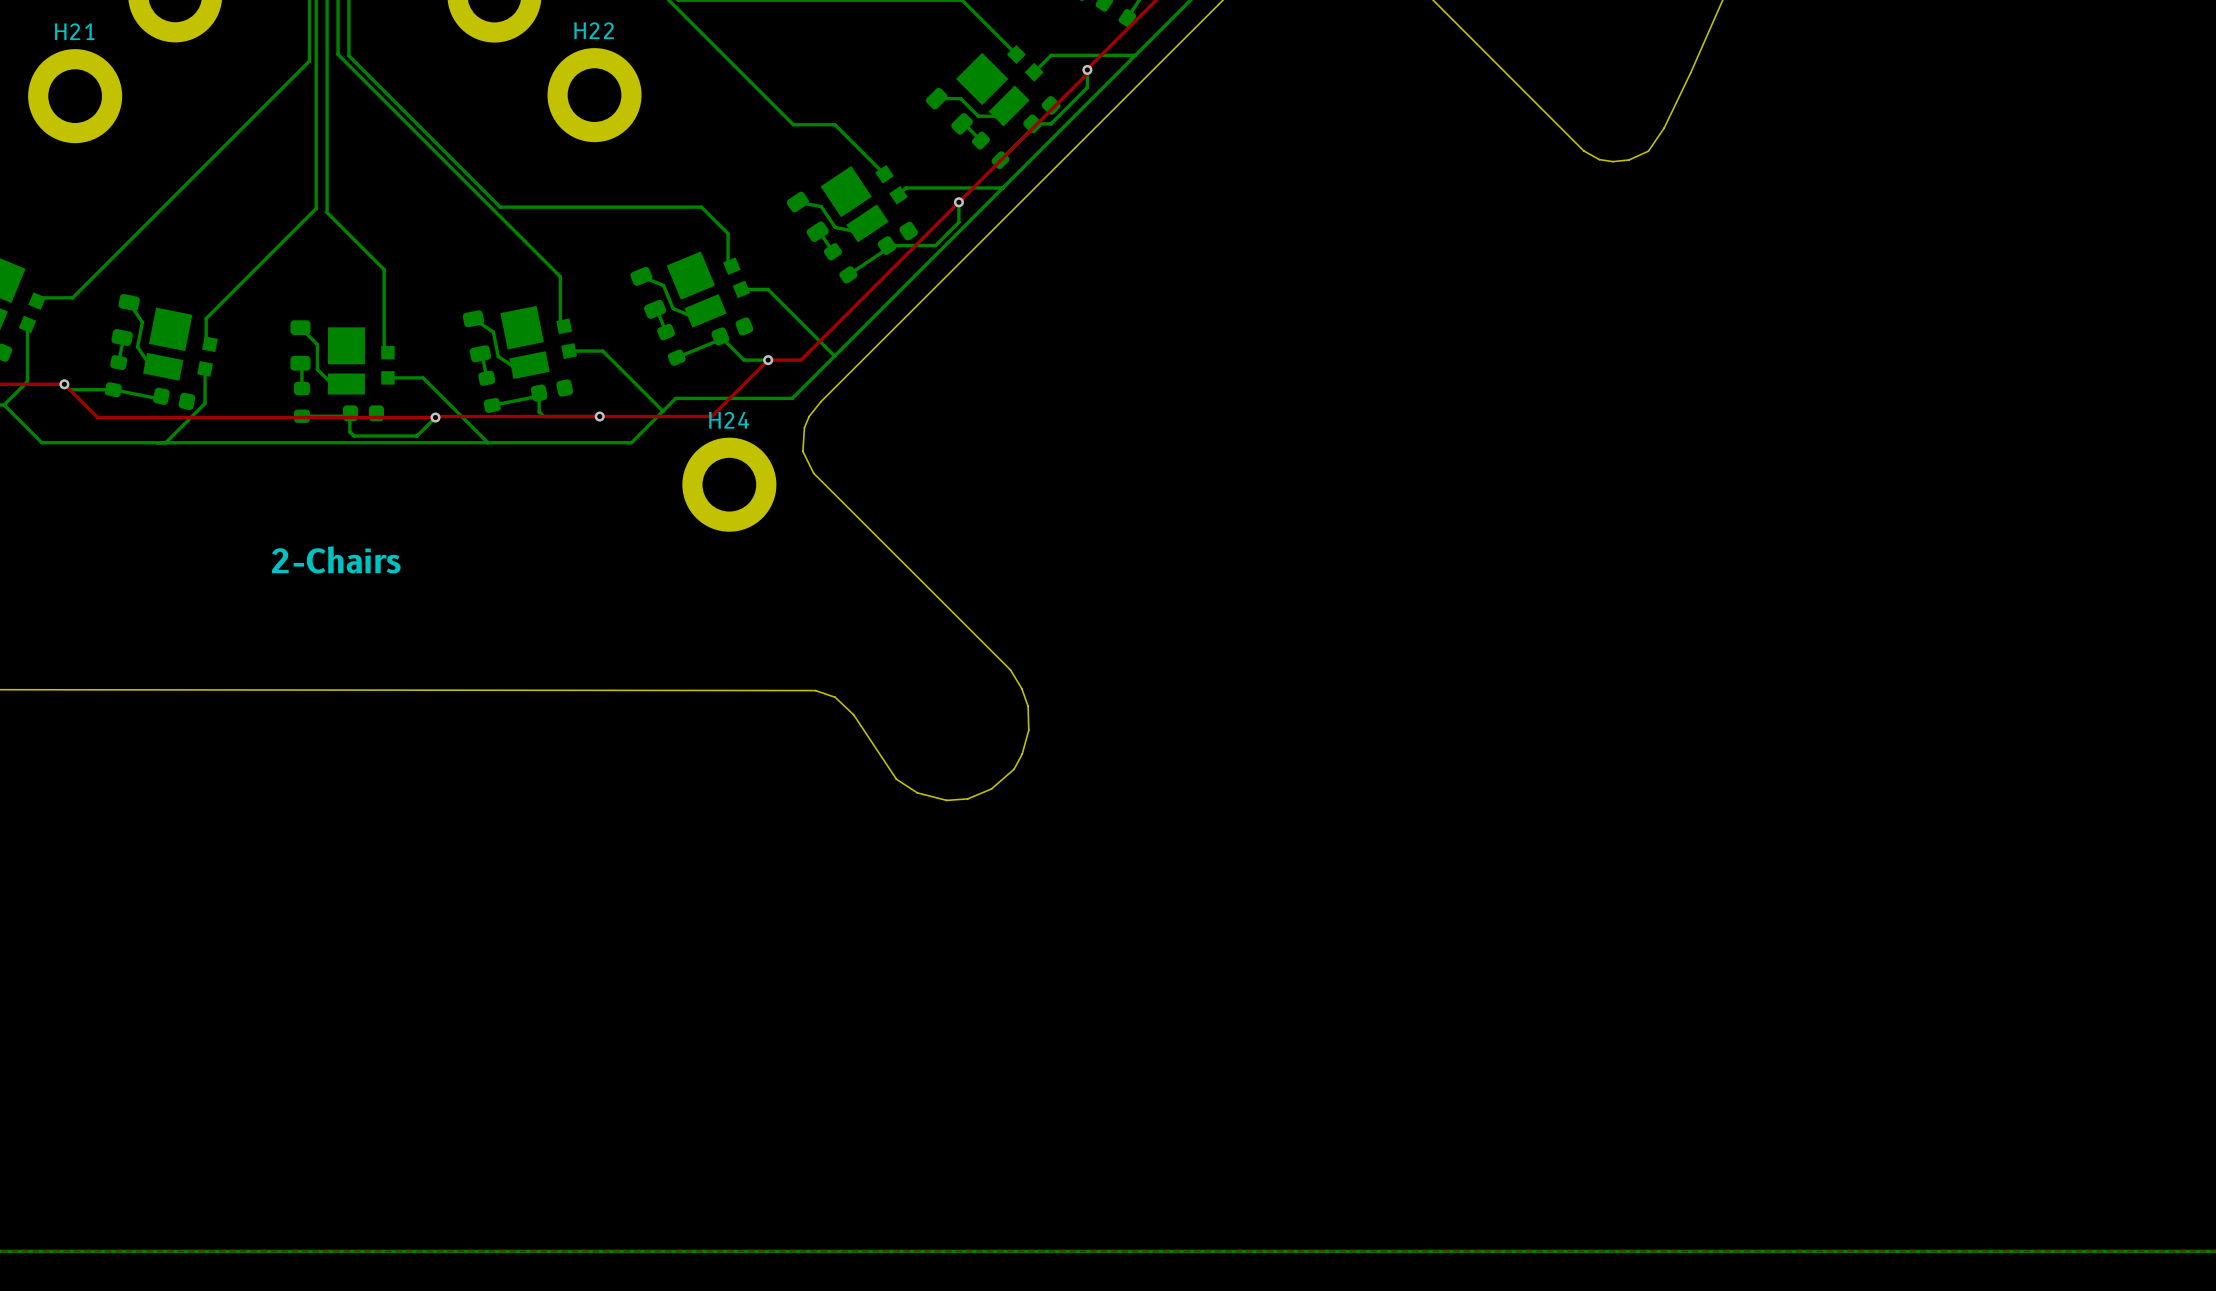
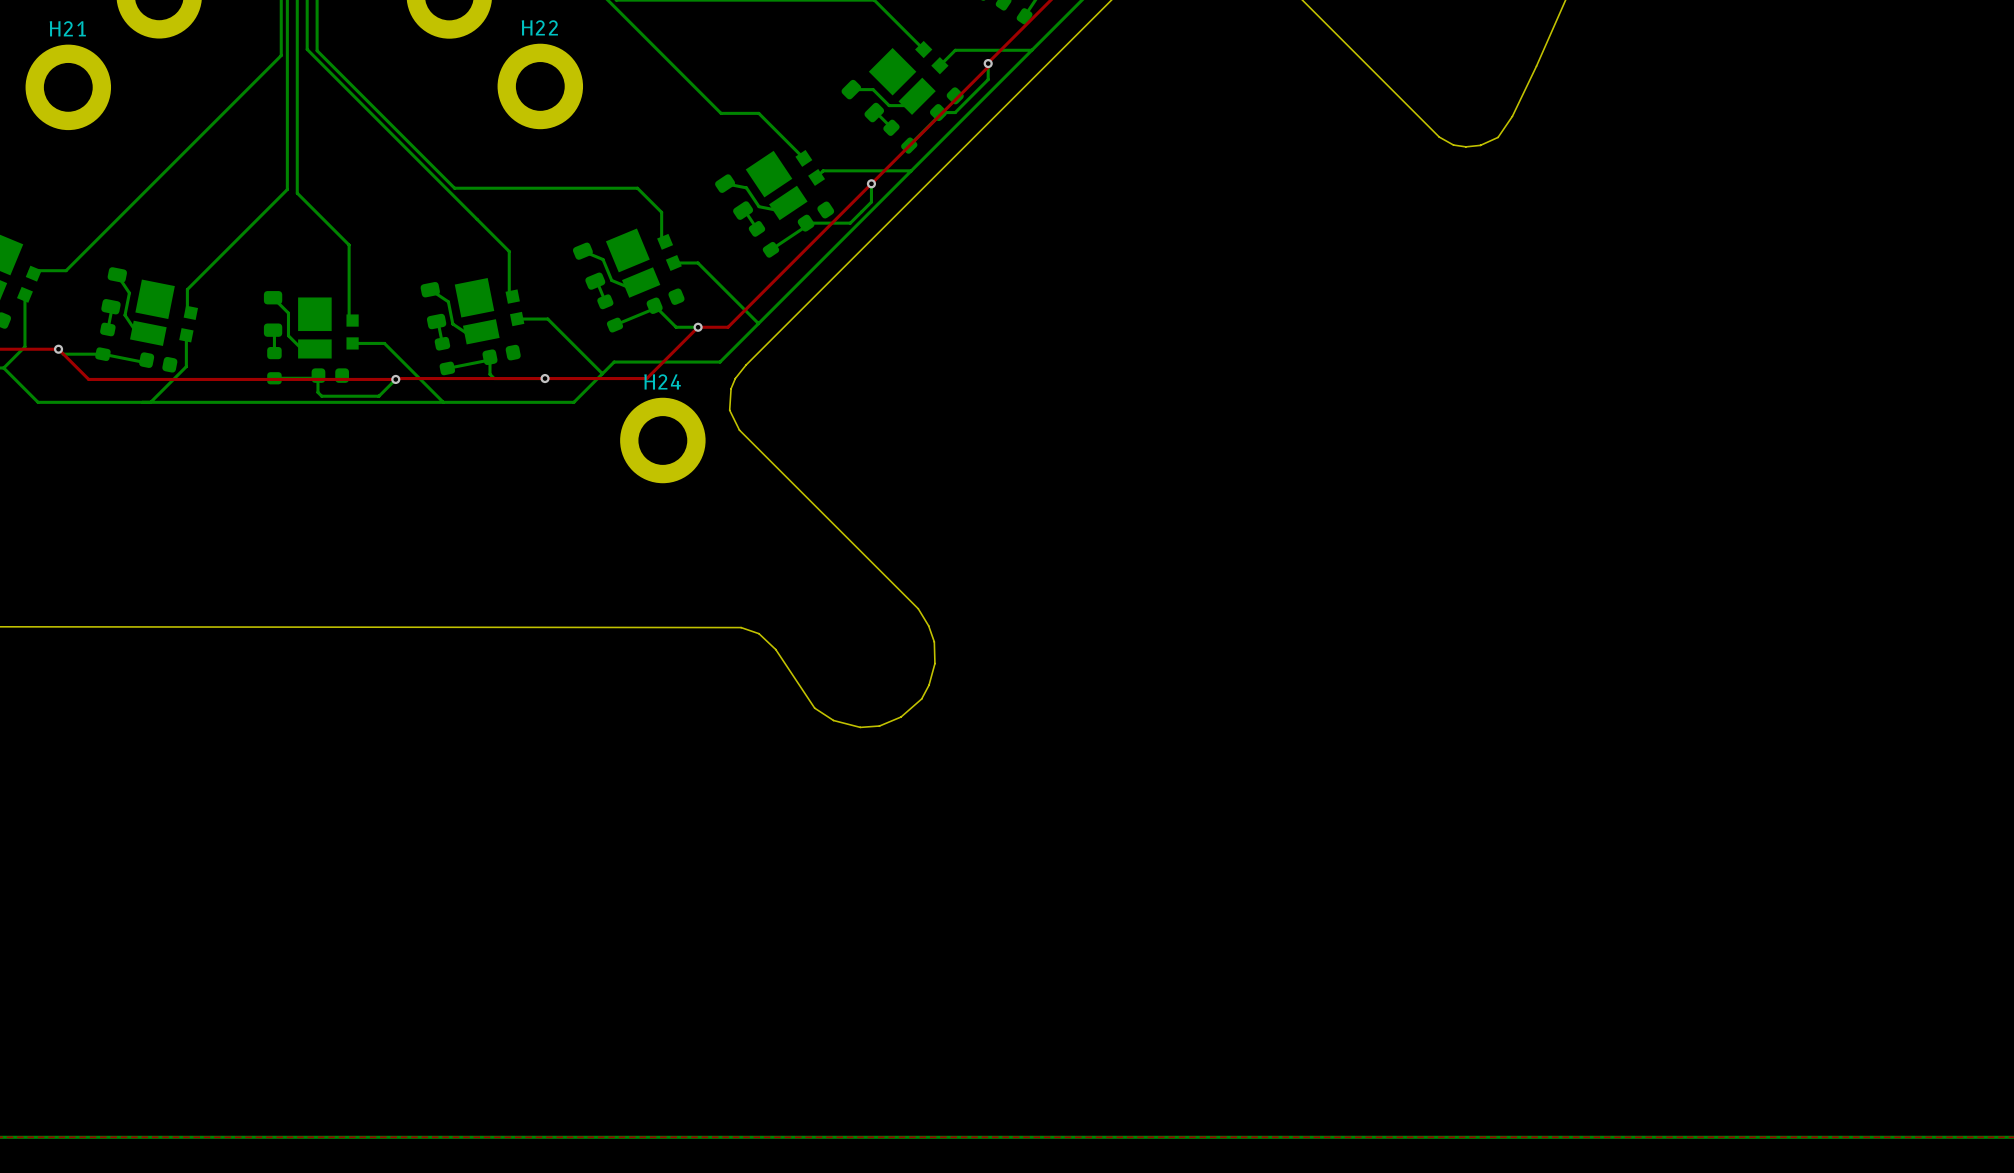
text: 2-Chairs (336, 559) -> none

